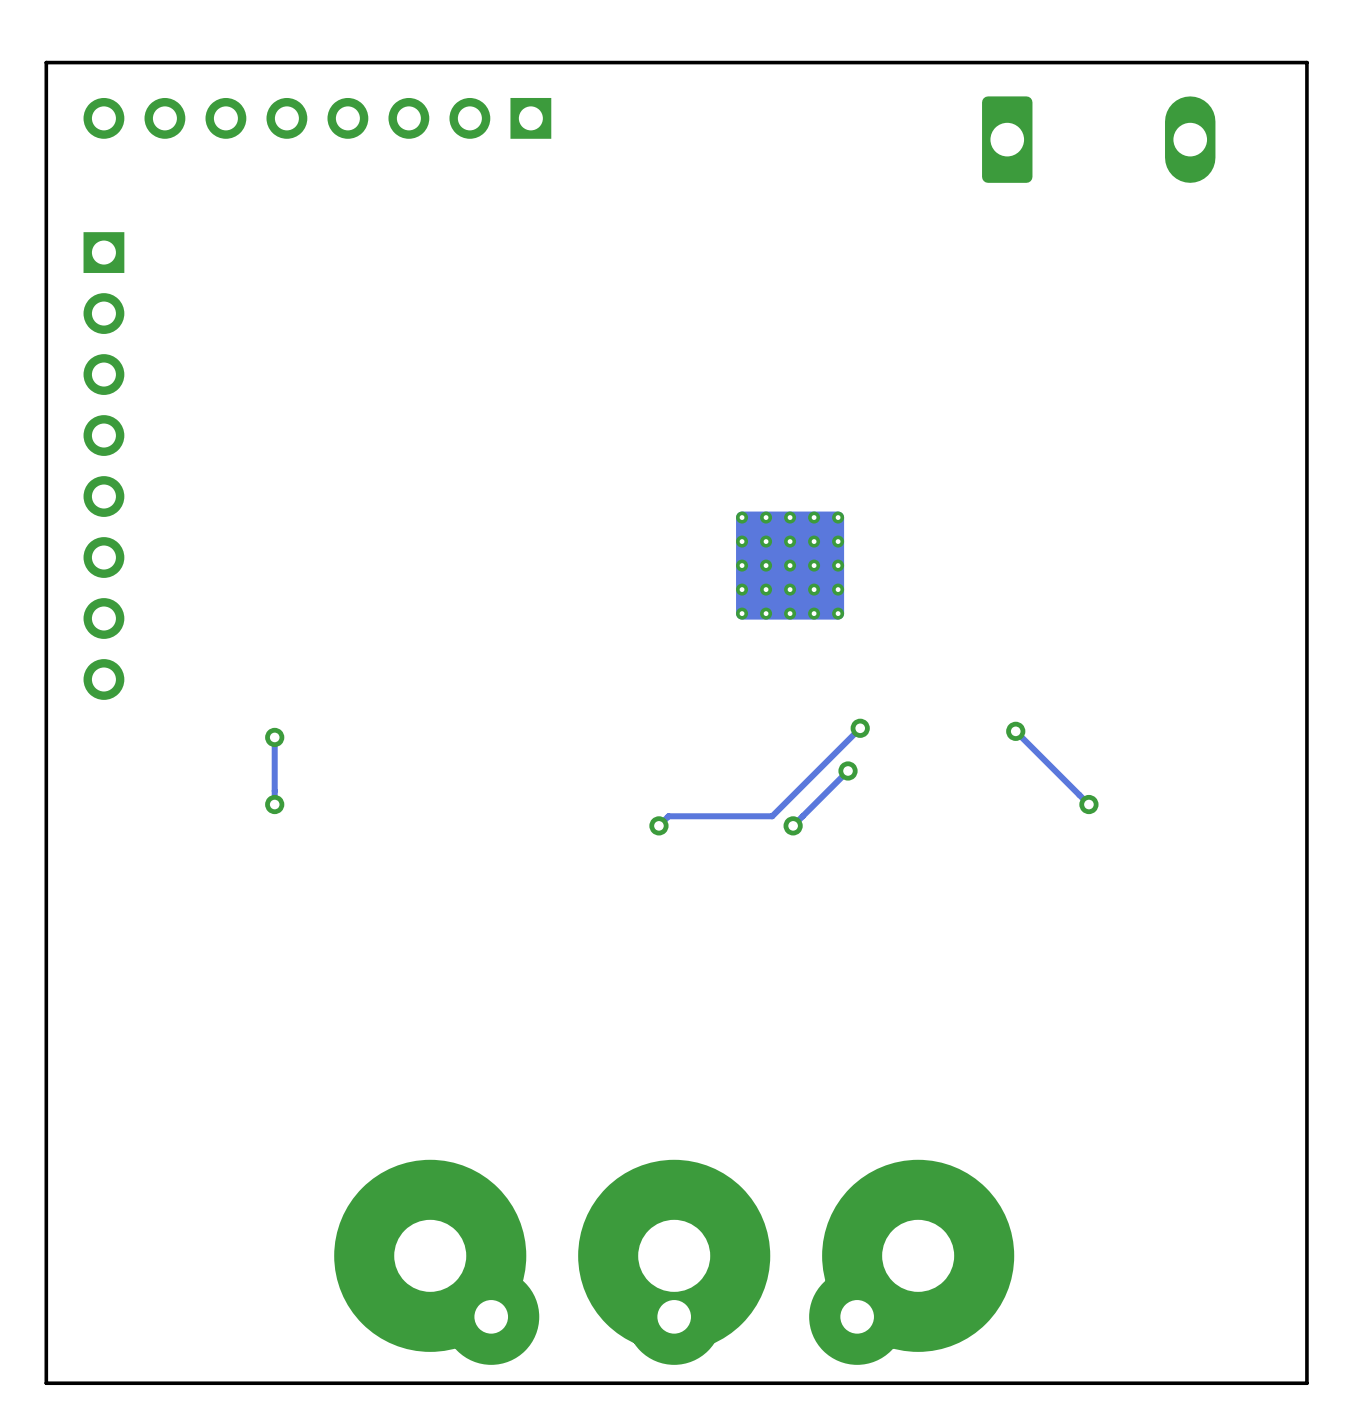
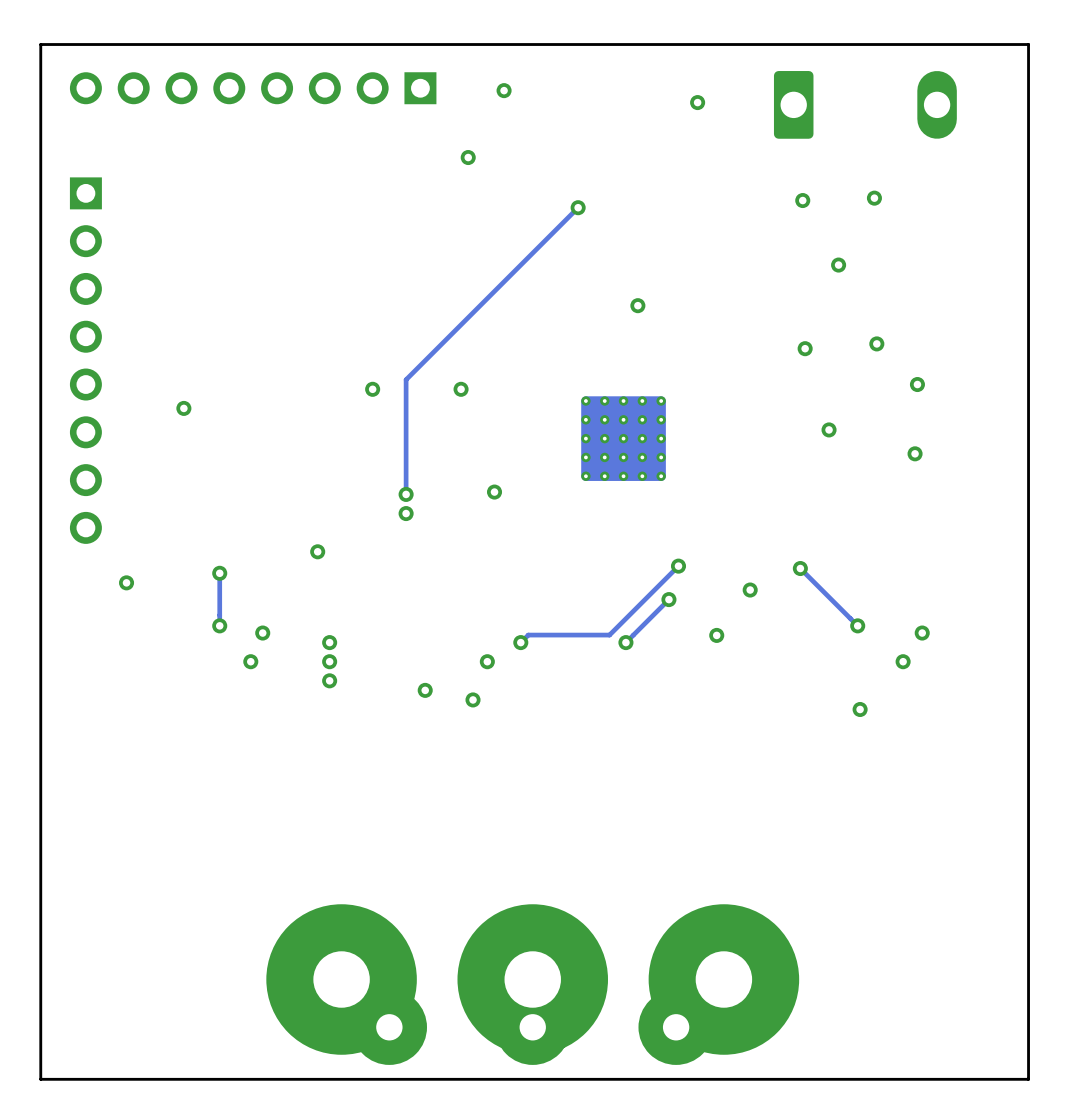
via: none -> (504, 90)
via: none -> (697, 102)
via: none -> (468, 157)
via: none -> (874, 198)
via: none -> (802, 200)
track: none -> (578, 207) (406, 379) (406, 494)
via: none -> (578, 207)
via: none -> (838, 265)
via: none -> (637, 305)
via: none -> (876, 343)
via: none -> (805, 348)
via: none -> (917, 384)
via: none -> (372, 389)
via: none -> (461, 389)
via: none -> (183, 408)
via: none -> (829, 429)
via: none -> (915, 453)
via: none -> (494, 492)
via: none -> (406, 494)
via: none -> (406, 513)
via: none -> (317, 551)
via: none -> (126, 582)
via: none -> (750, 590)
via: none -> (262, 633)
via: none -> (922, 633)
via: none -> (716, 635)
via: none -> (329, 642)
via: none -> (250, 661)
via: none -> (329, 661)
via: none -> (487, 661)
via: none -> (903, 661)
via: none -> (329, 680)
via: none -> (425, 690)
via: none -> (473, 699)
via: none -> (860, 709)

